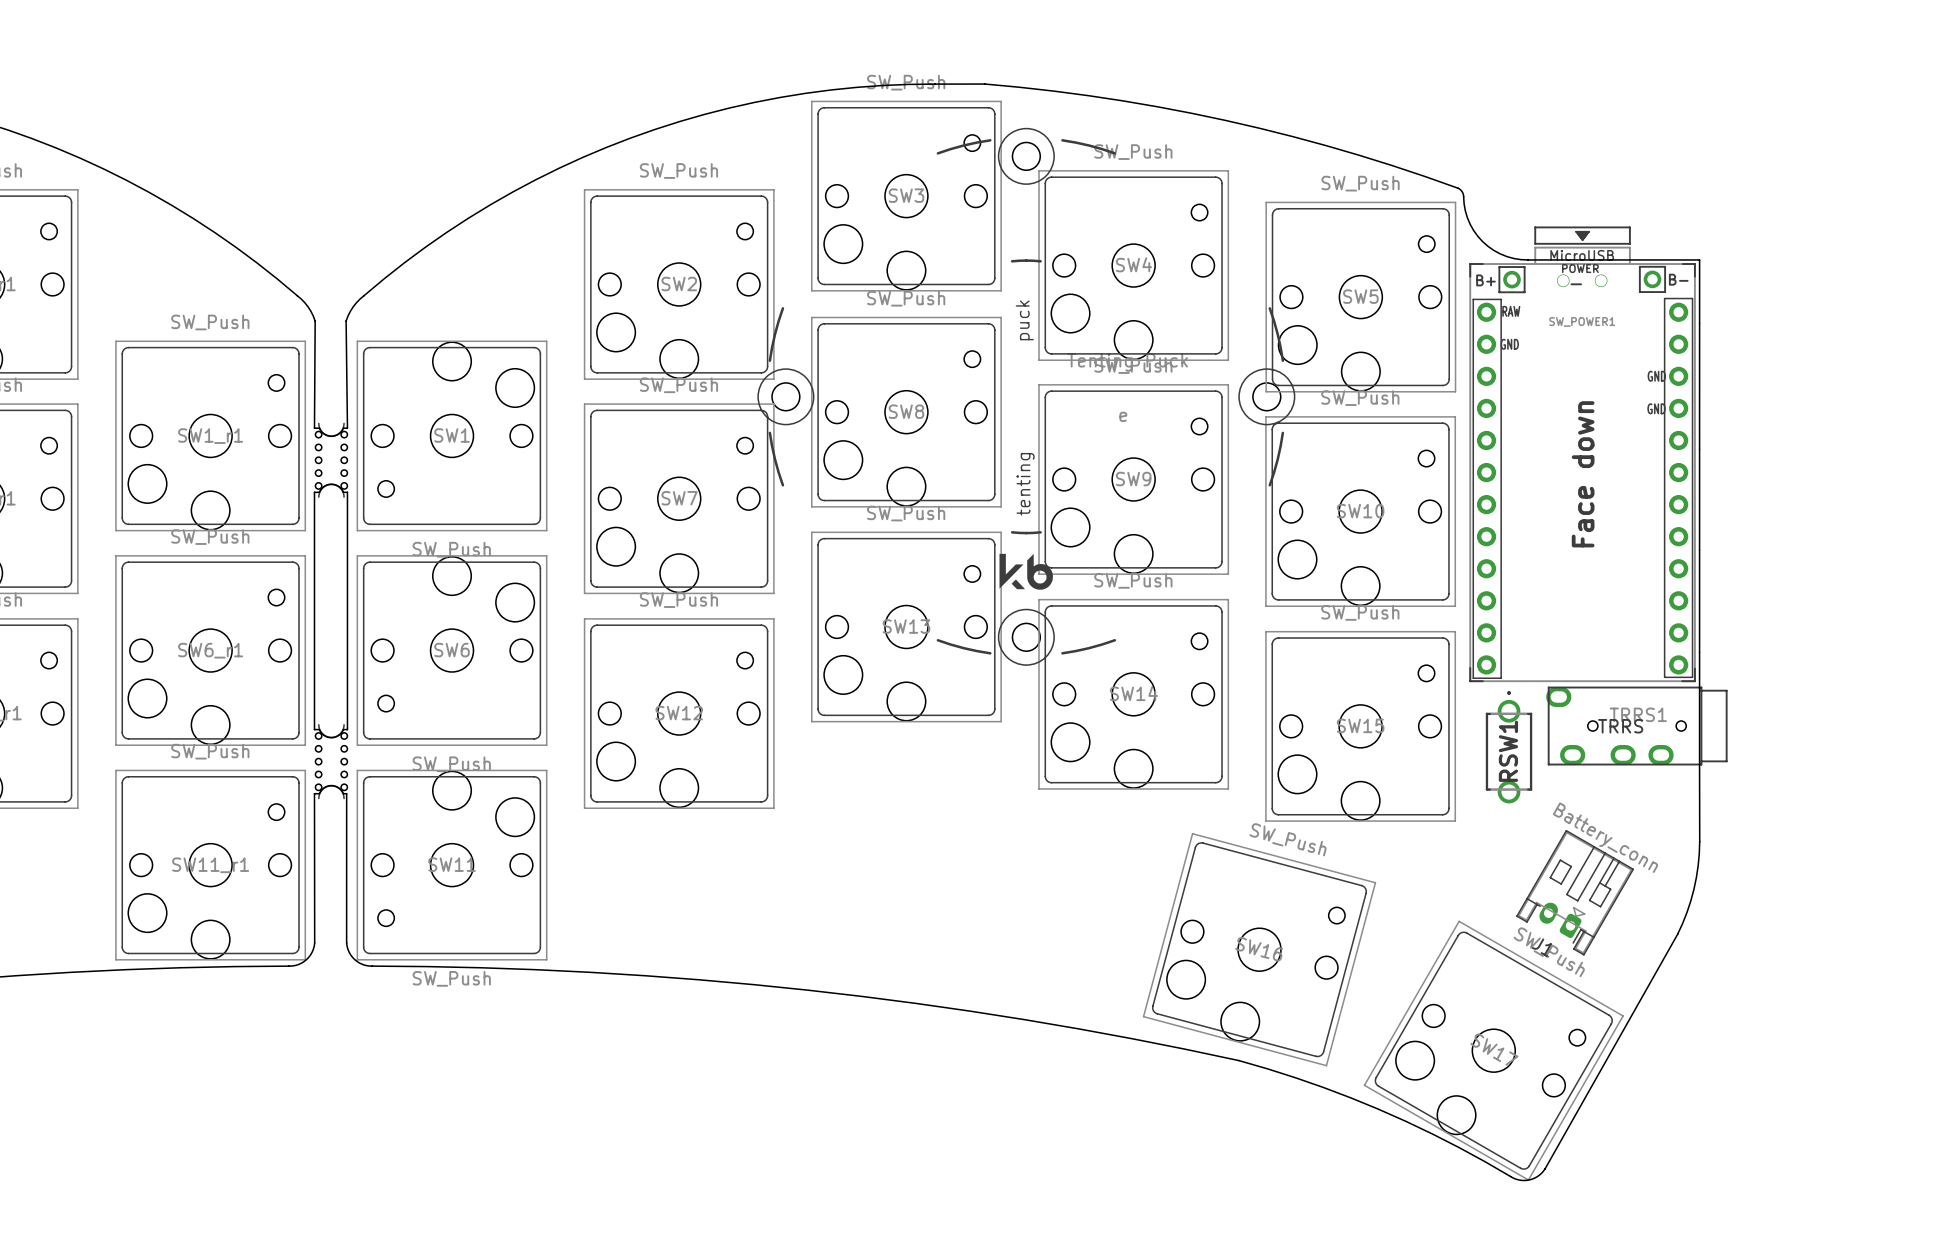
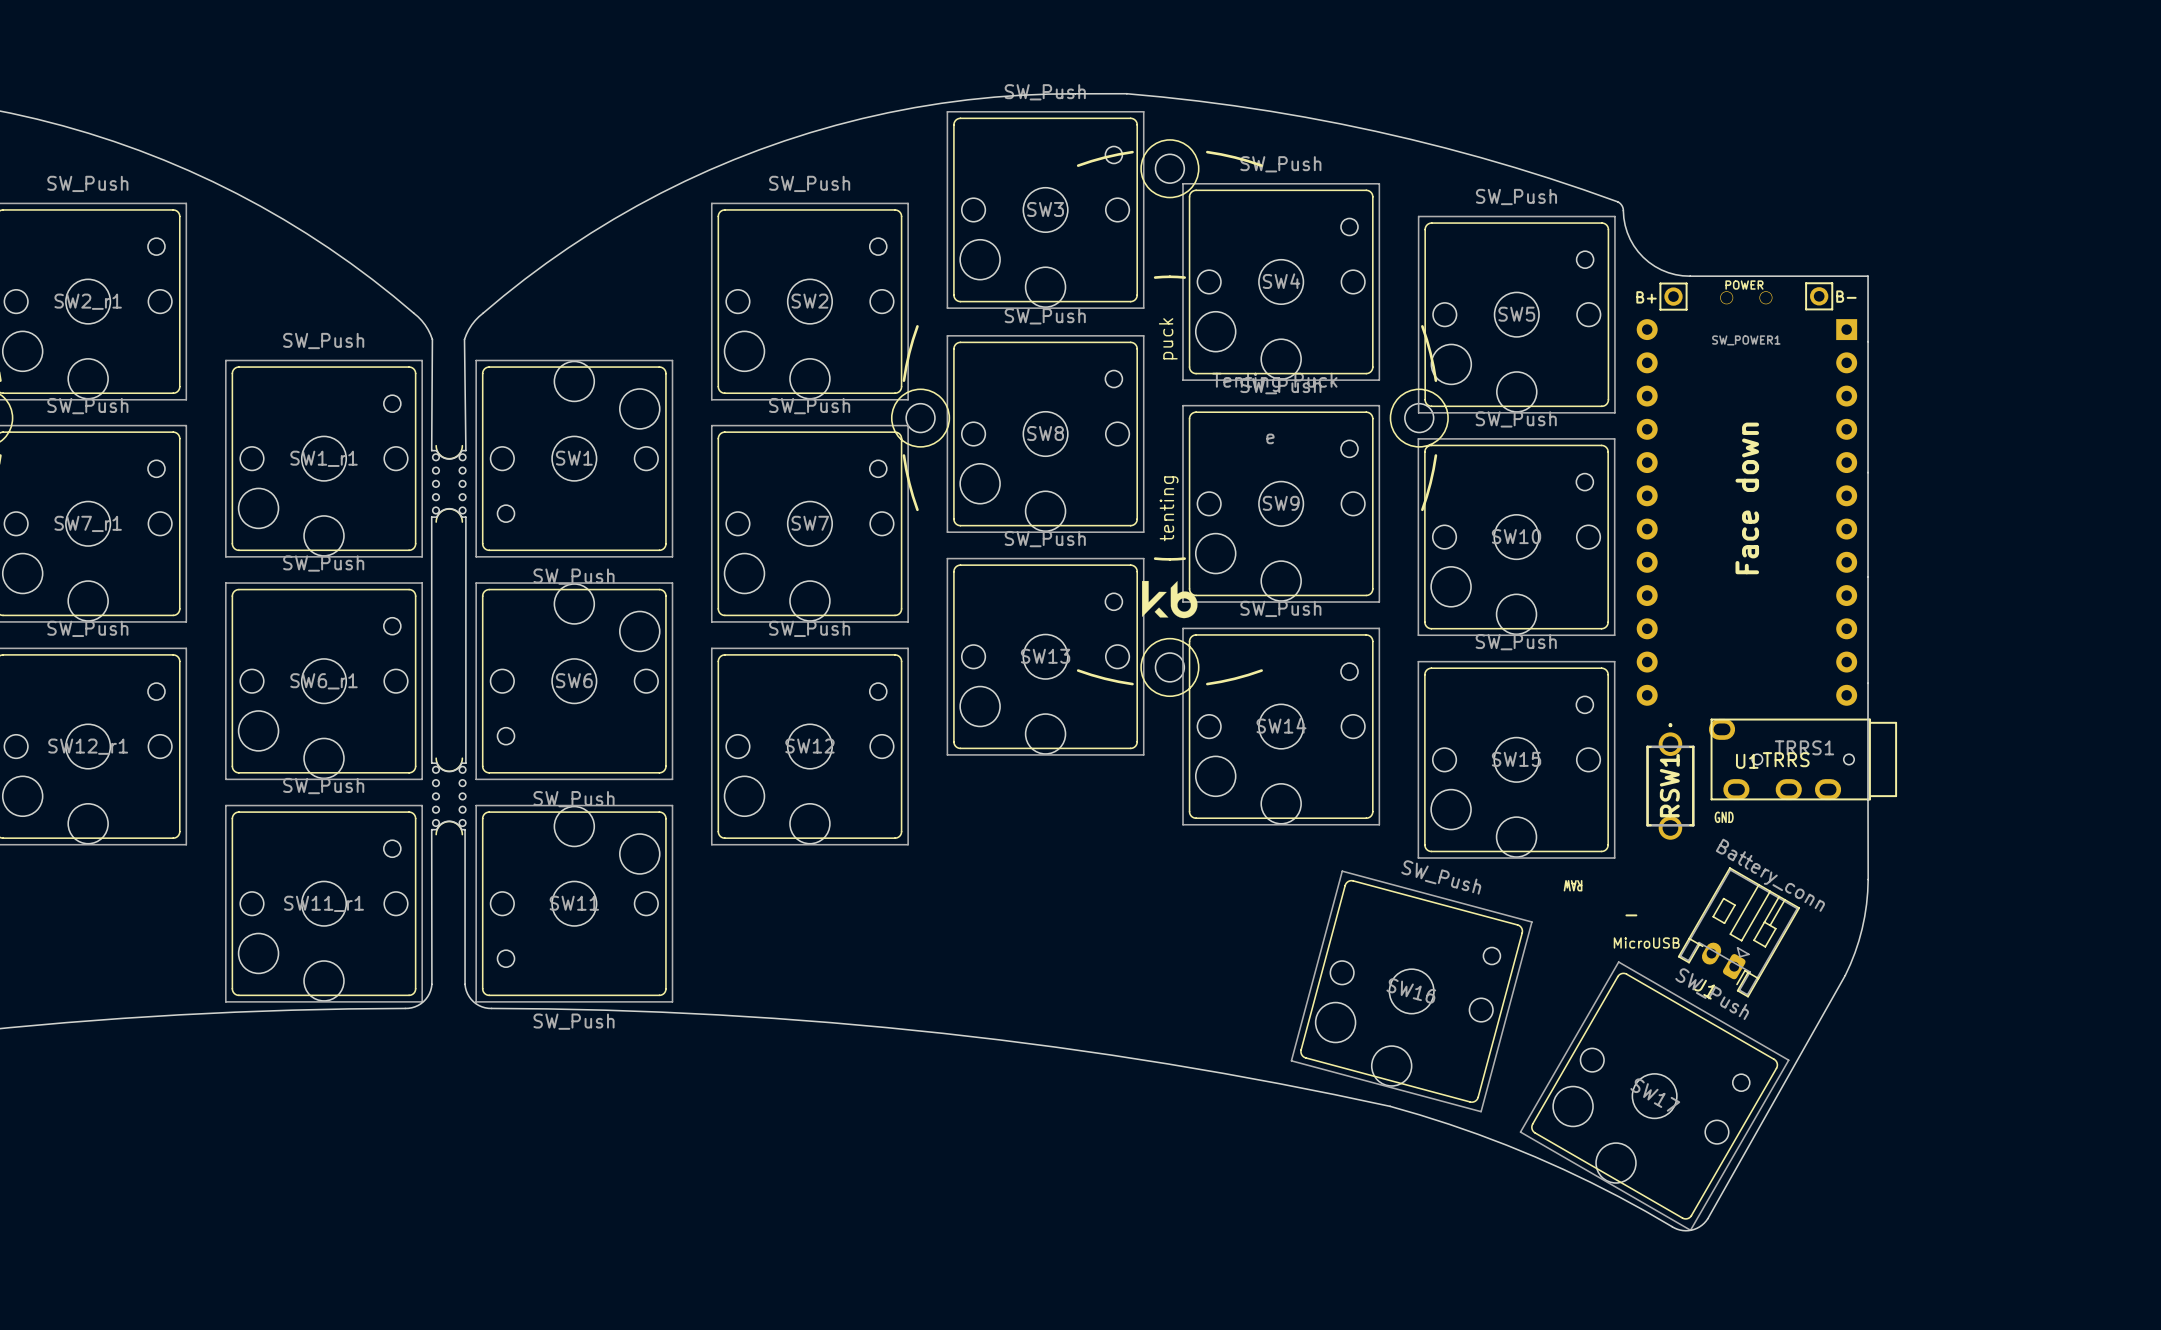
line: (1664, 298) (1692, 298) (1692, 677) (1664, 677) (1664, 298) -> none
line: (1473, 299) (1501, 299) (1501, 678) (1473, 678) (1473, 299) -> none
part: (1582, 454) -> none
U1: none -> (1746, 512)

